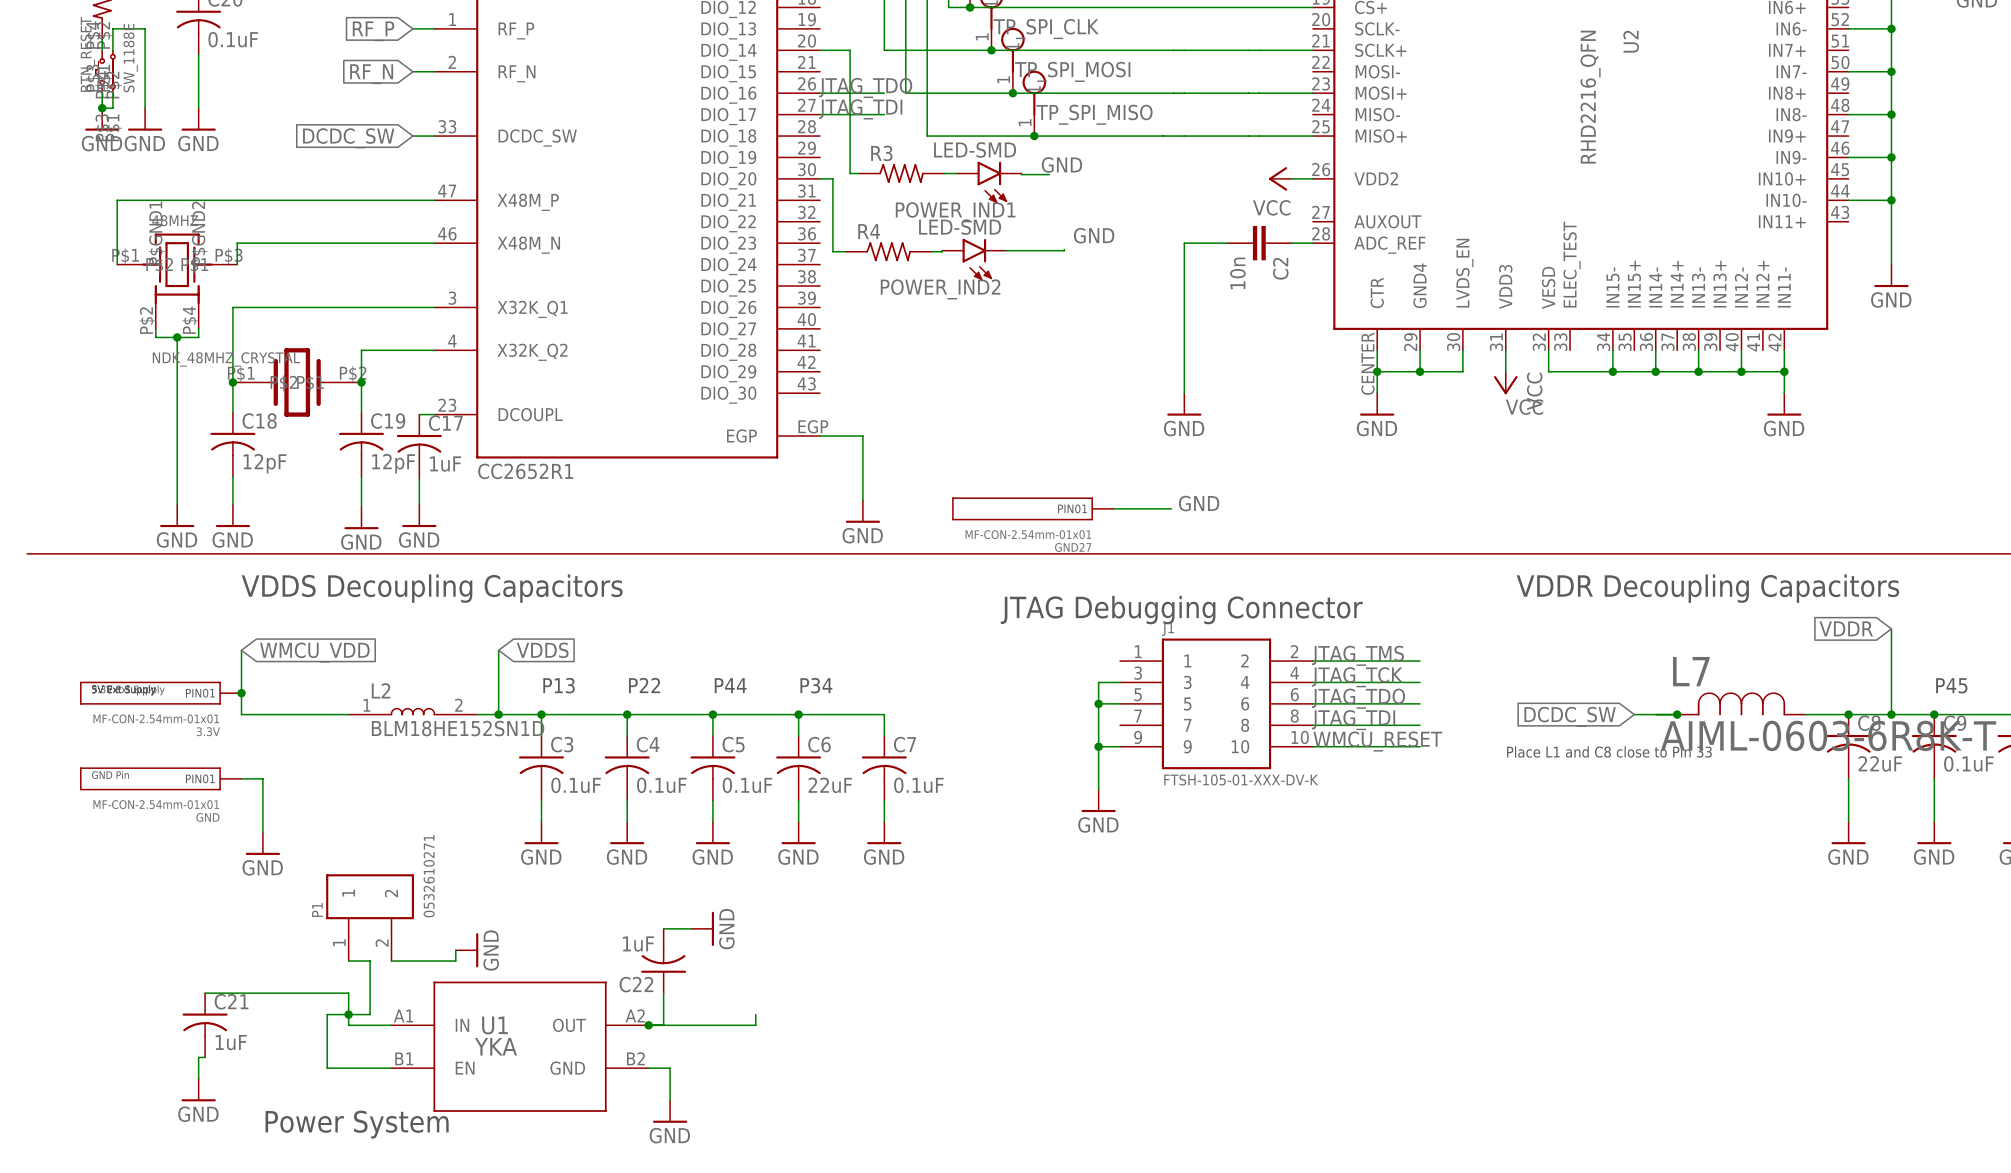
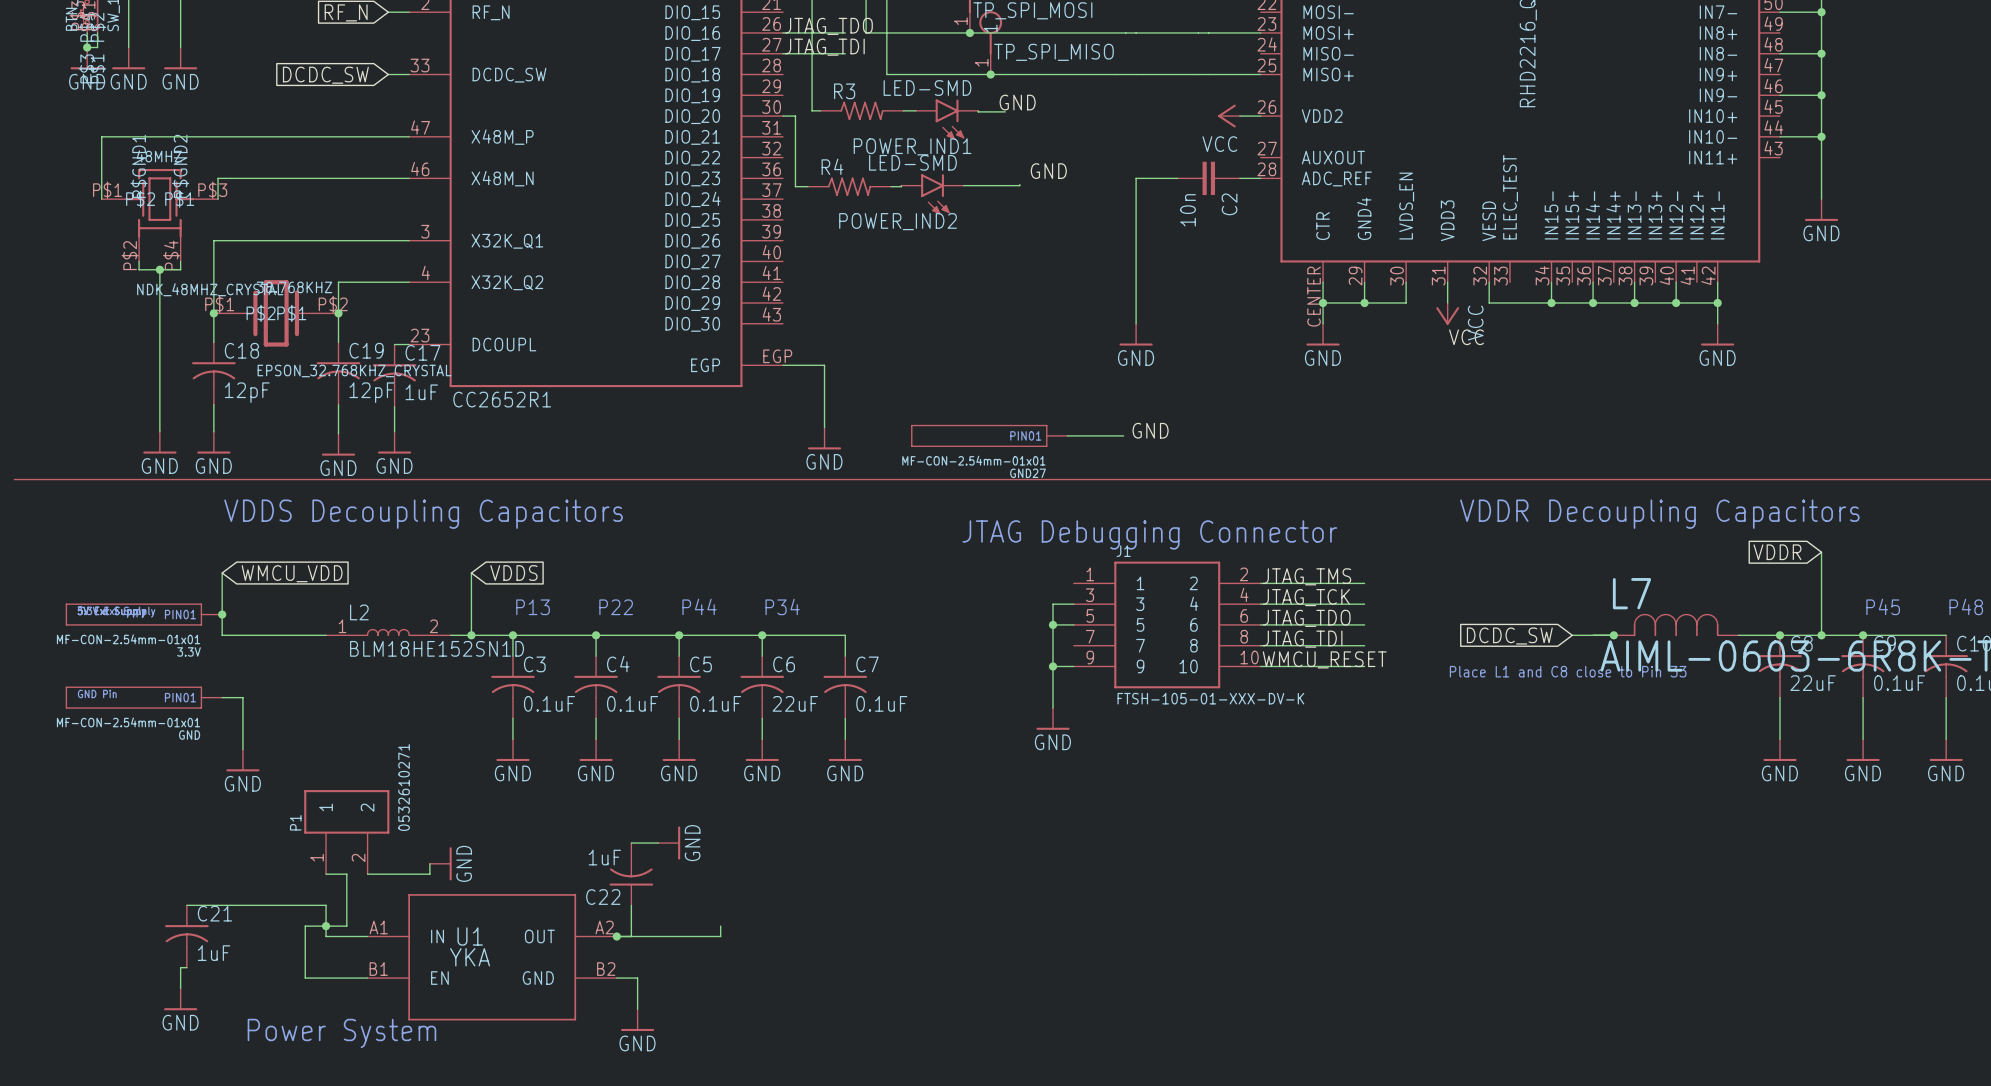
38.768KHZ name: none -> 38.768KHZ (294, 287)
38.768KHZ value: none -> EPSON_32.768KHZ_CRYSTAL (354, 370)

